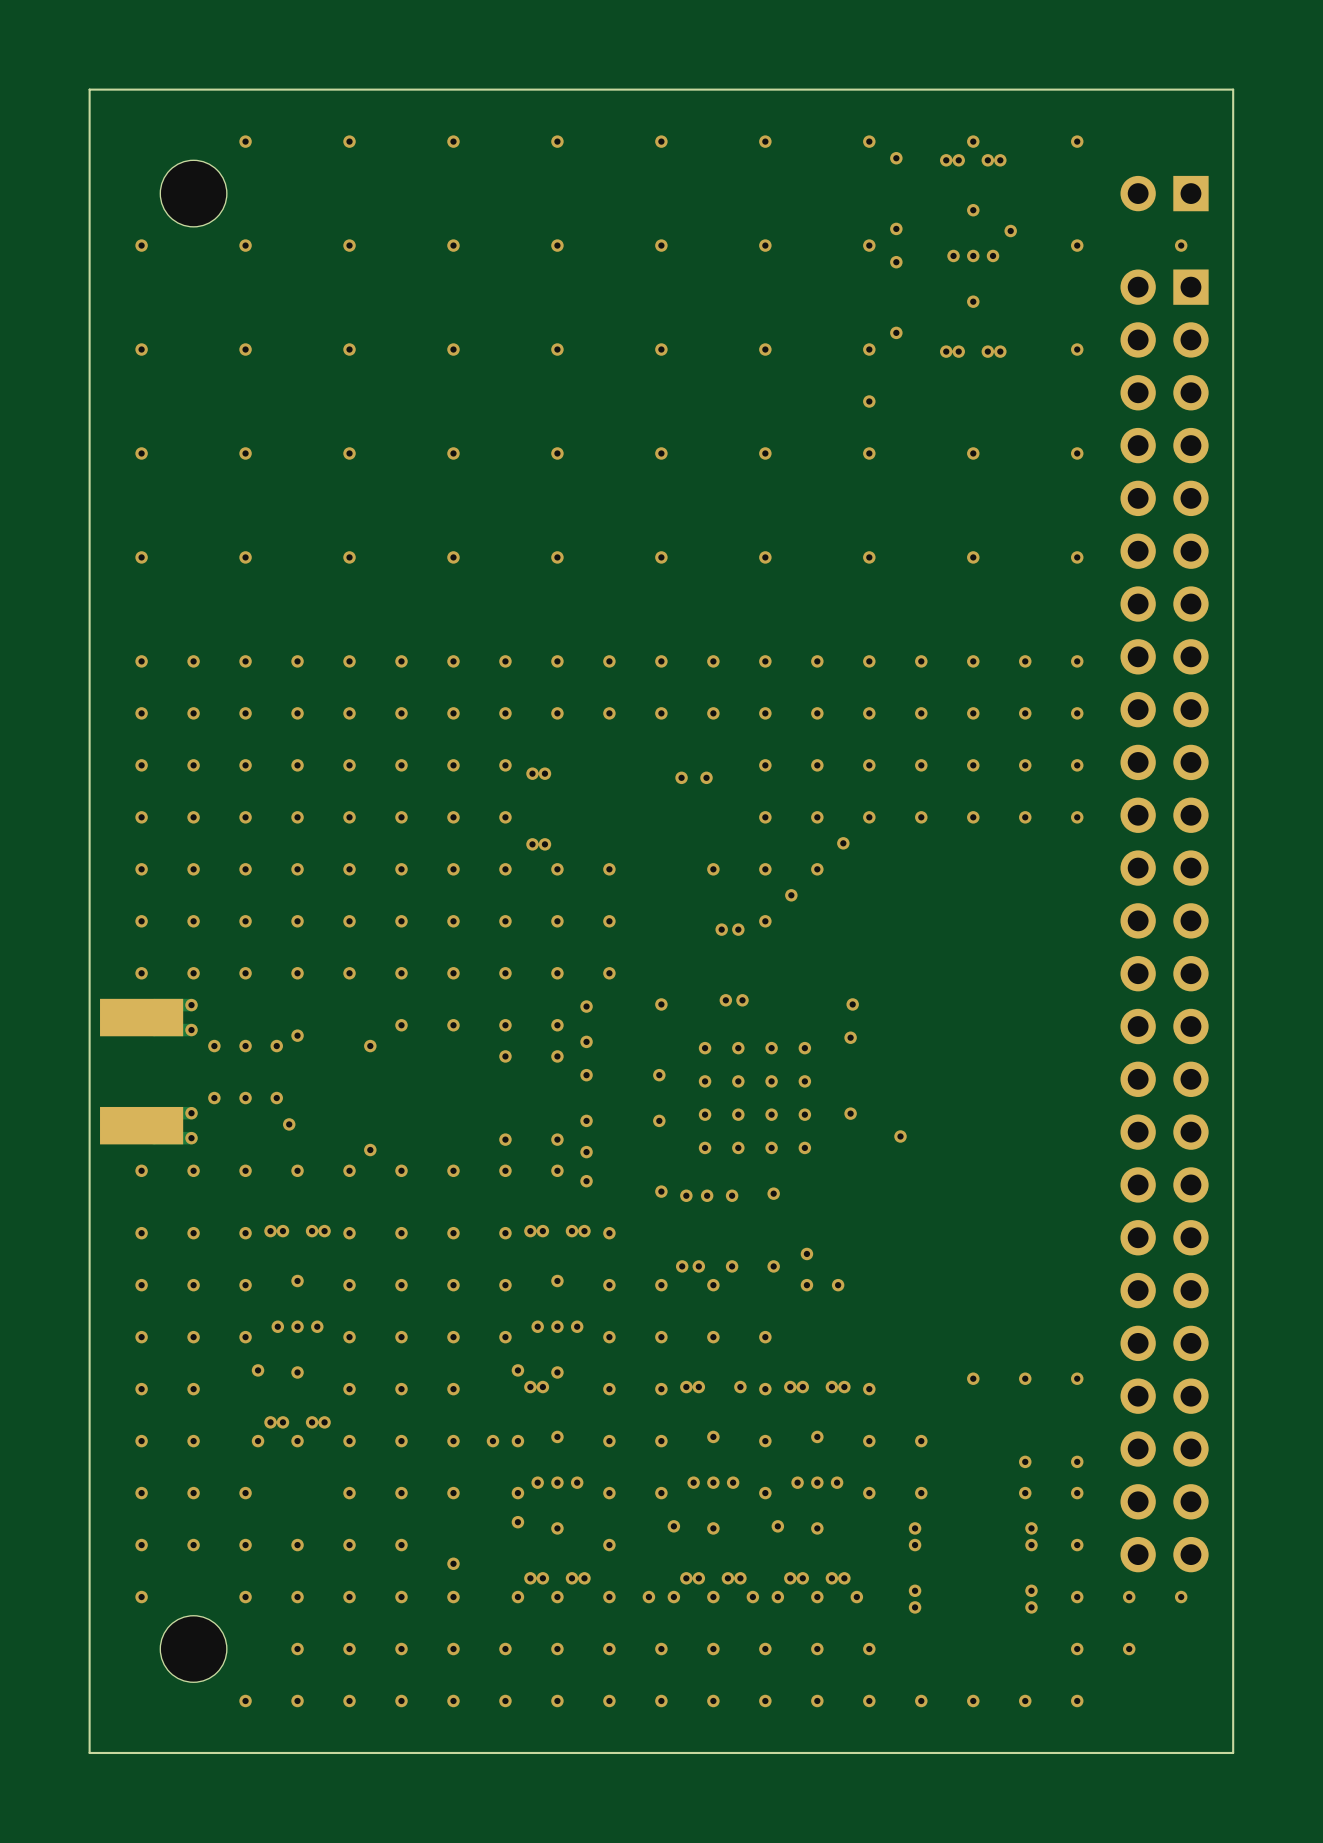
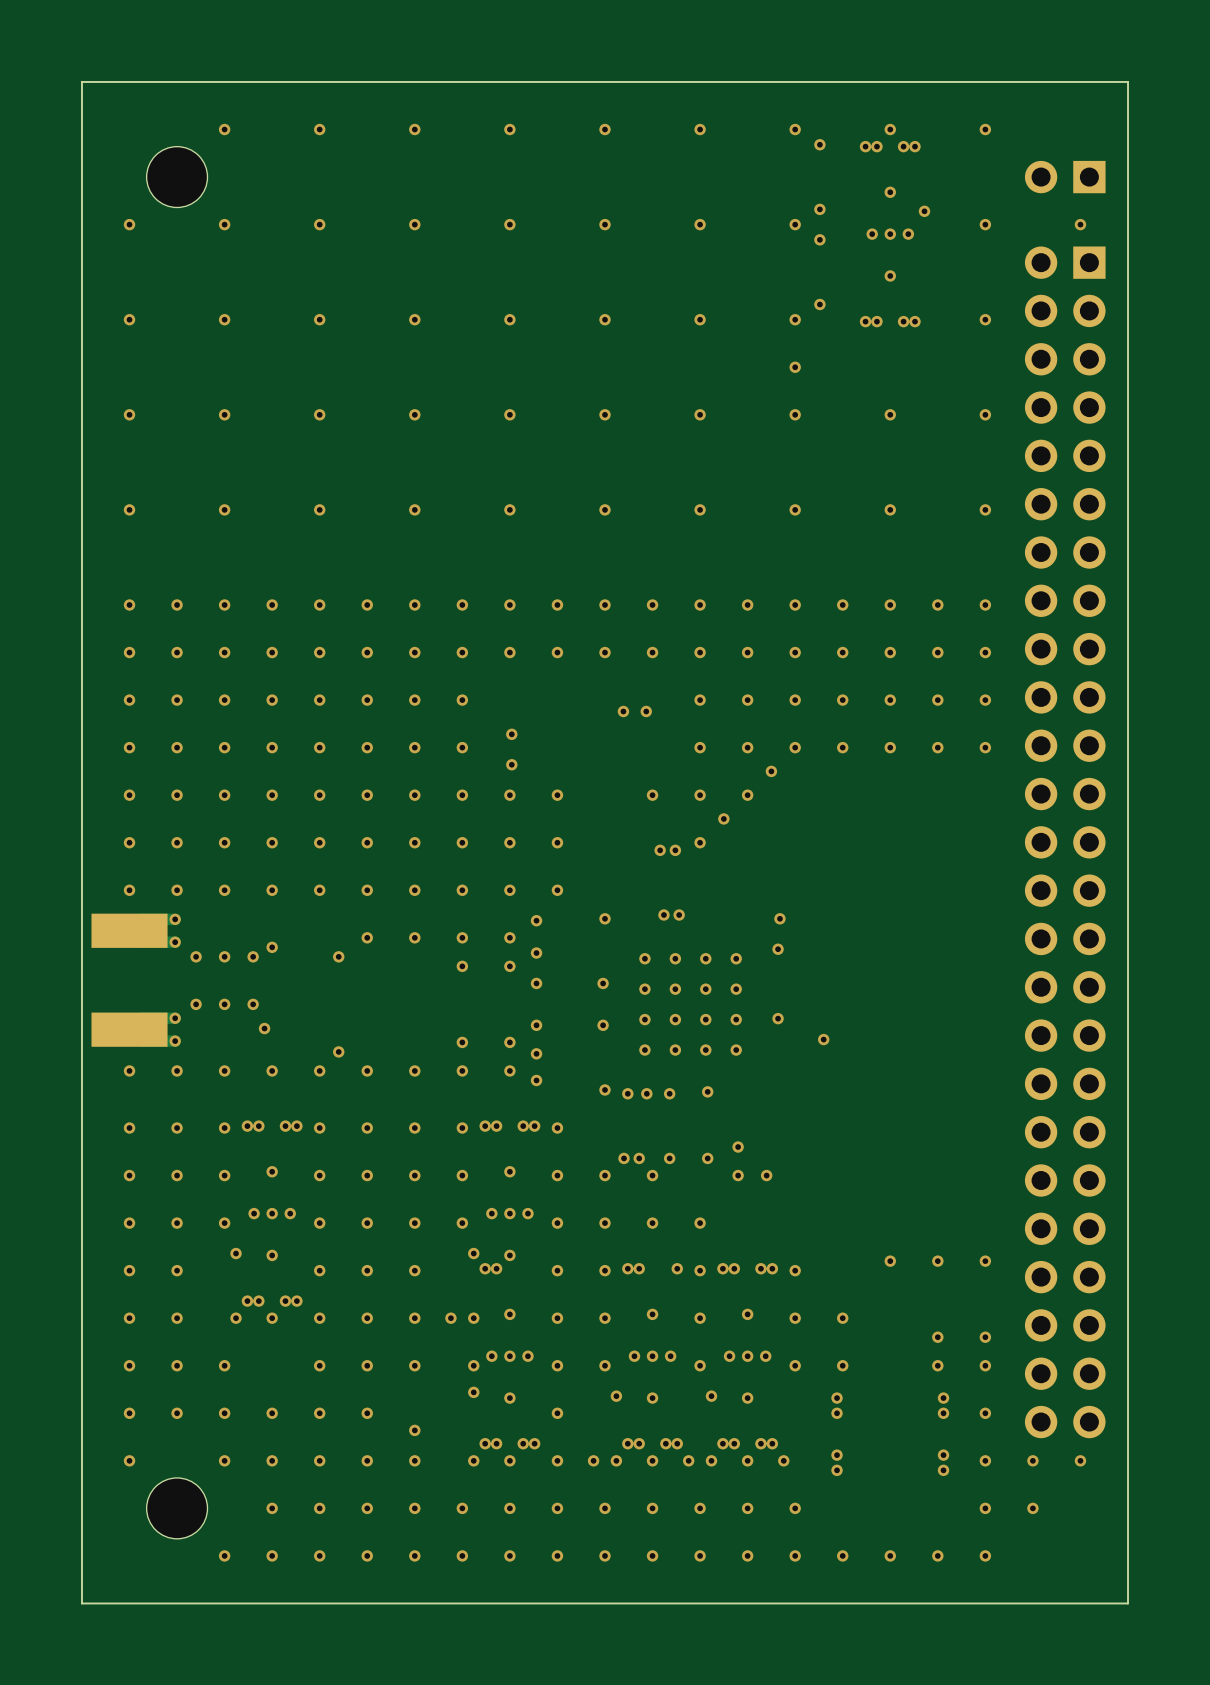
via: (532, 773) -> none
via: (544, 773) -> none
via: none -> (511, 734)
via: none -> (511, 764)
via: (532, 844) -> none
via: (544, 844) -> none

